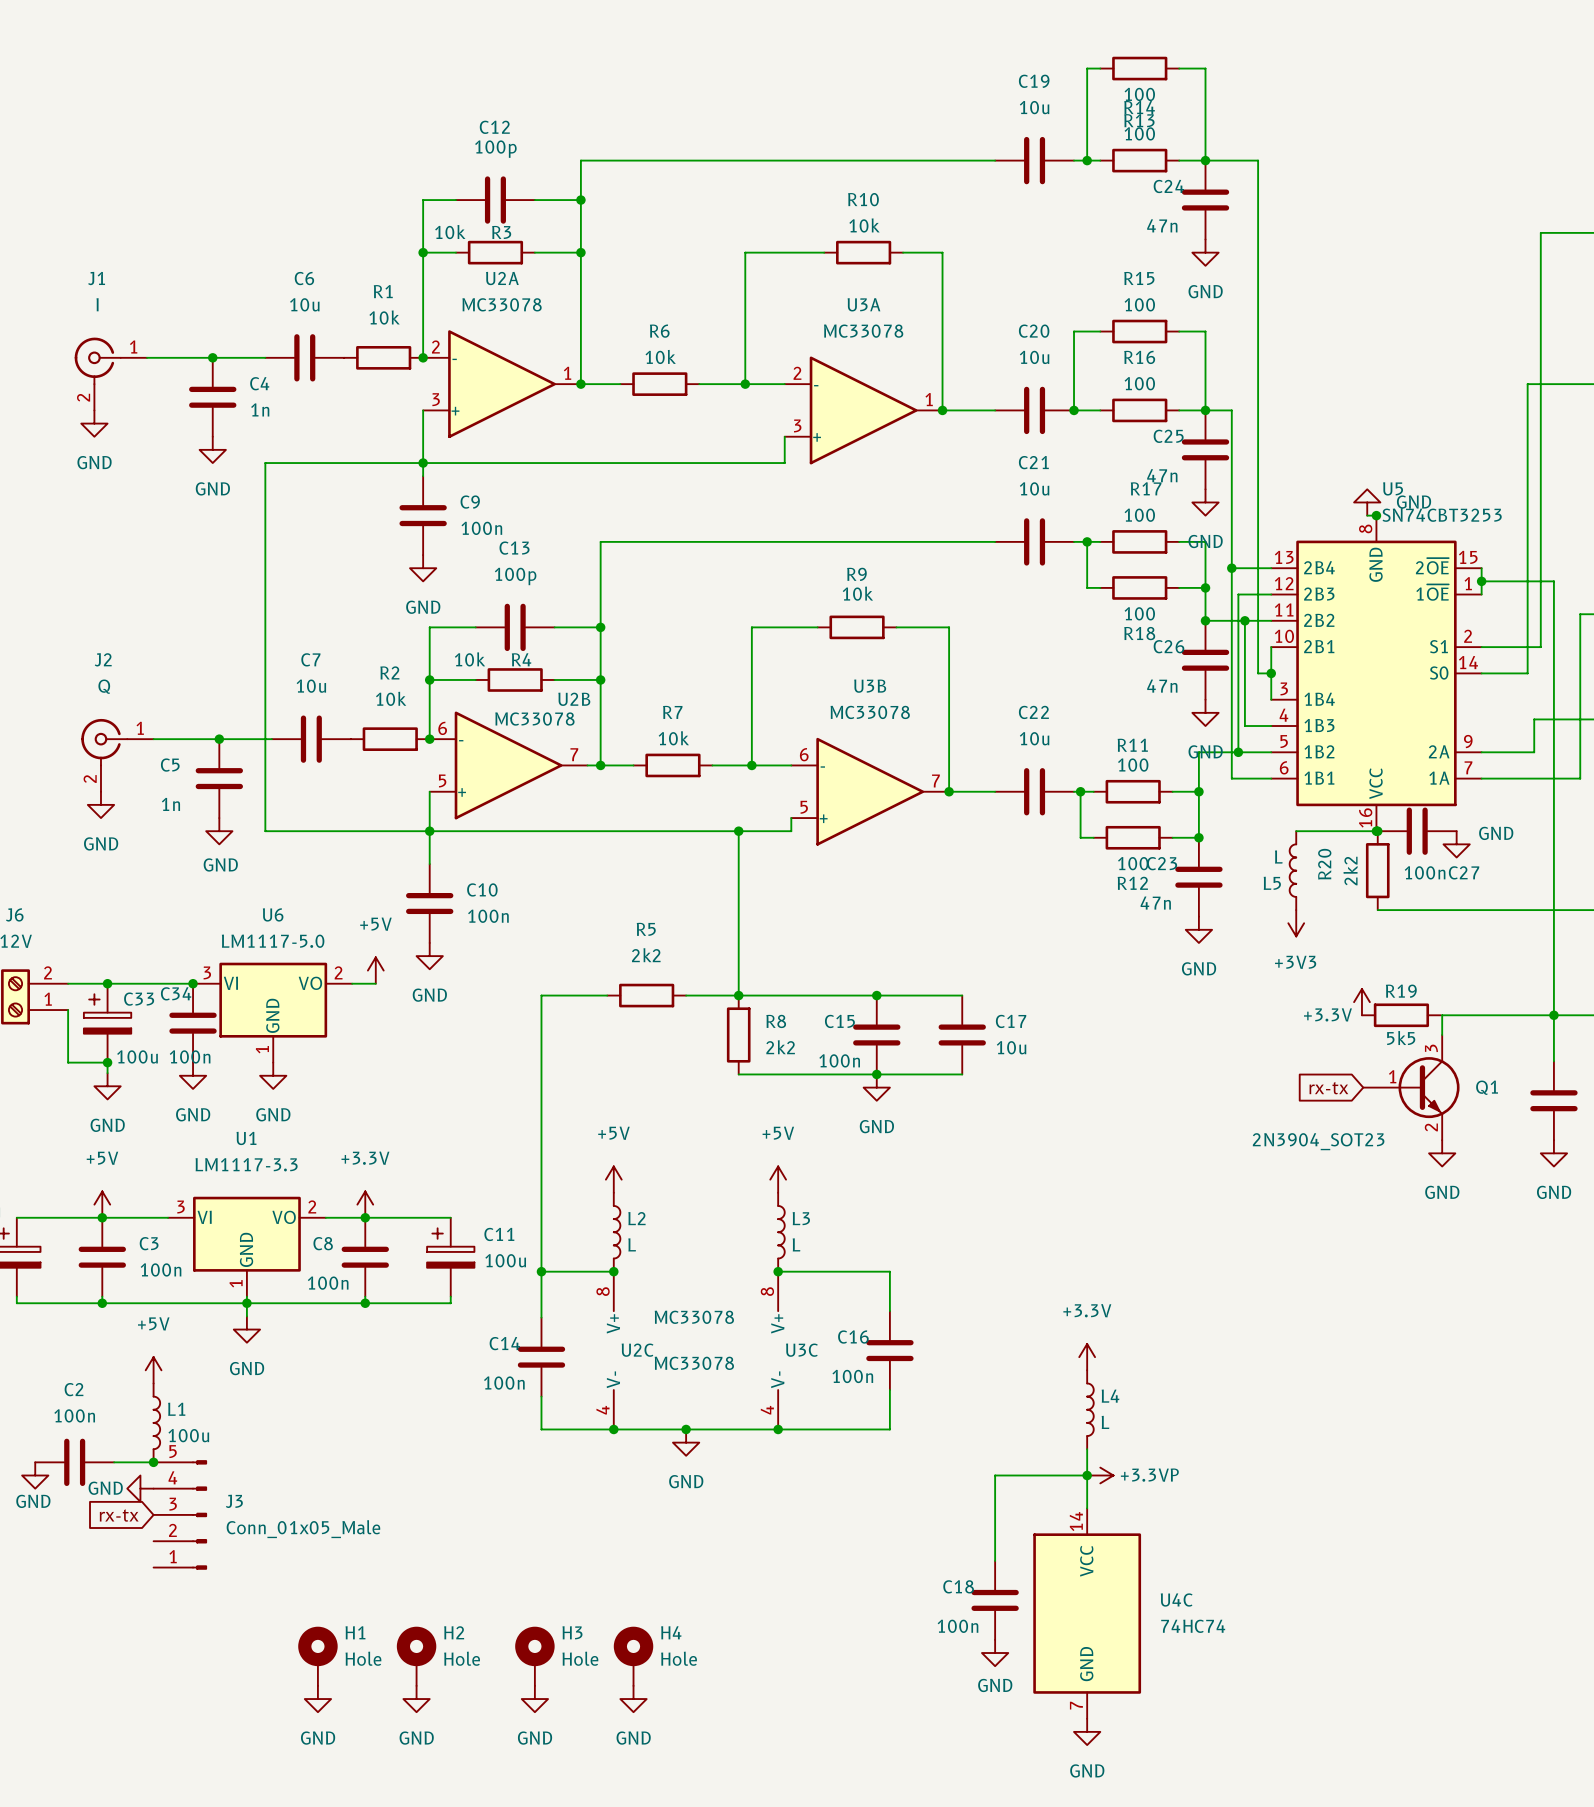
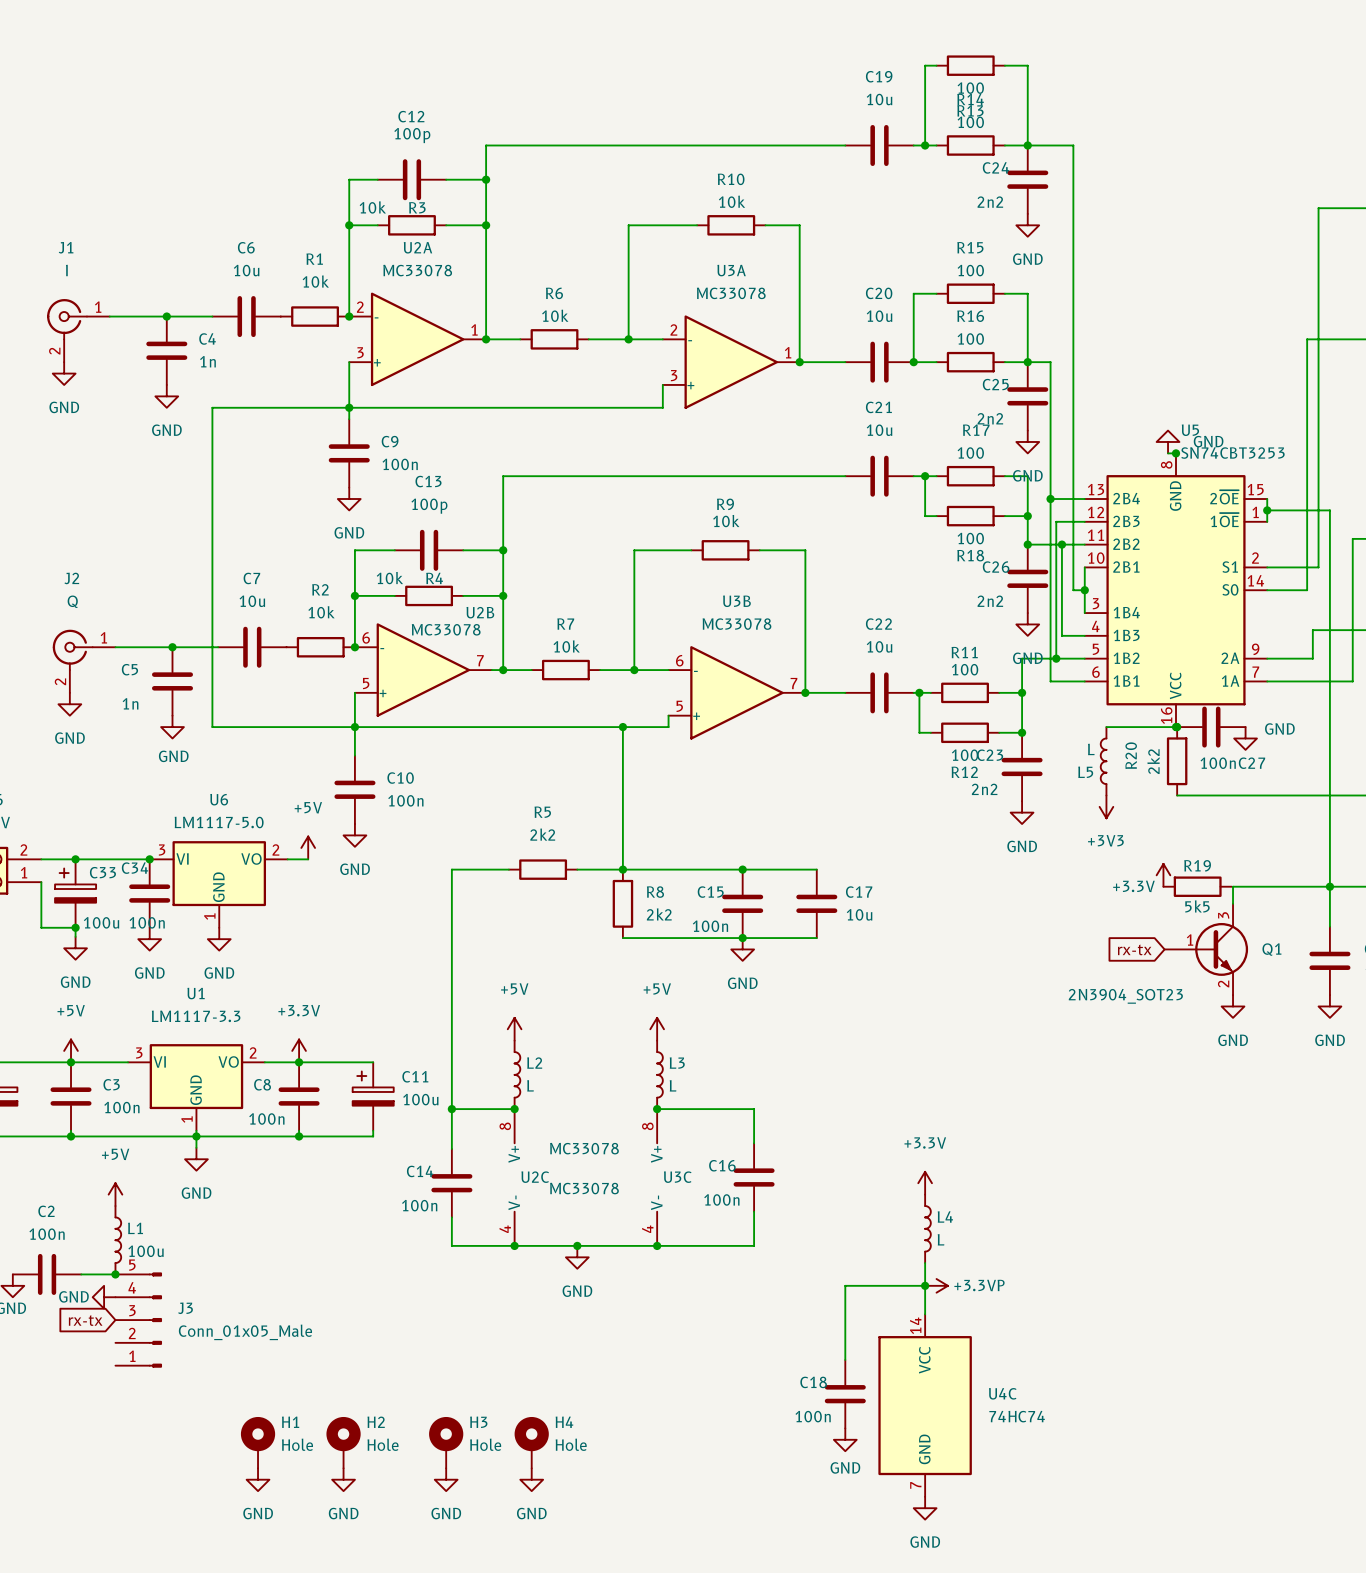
C24 value: 47n (1162, 225) -> 2n2 (990, 202)
C25 value: 47n (1162, 475) -> 2n2 (990, 418)
C26 value: 47n (1162, 686) -> 2n2 (990, 601)
C23 value: 47n (1155, 903) -> 2n2 (984, 789)

